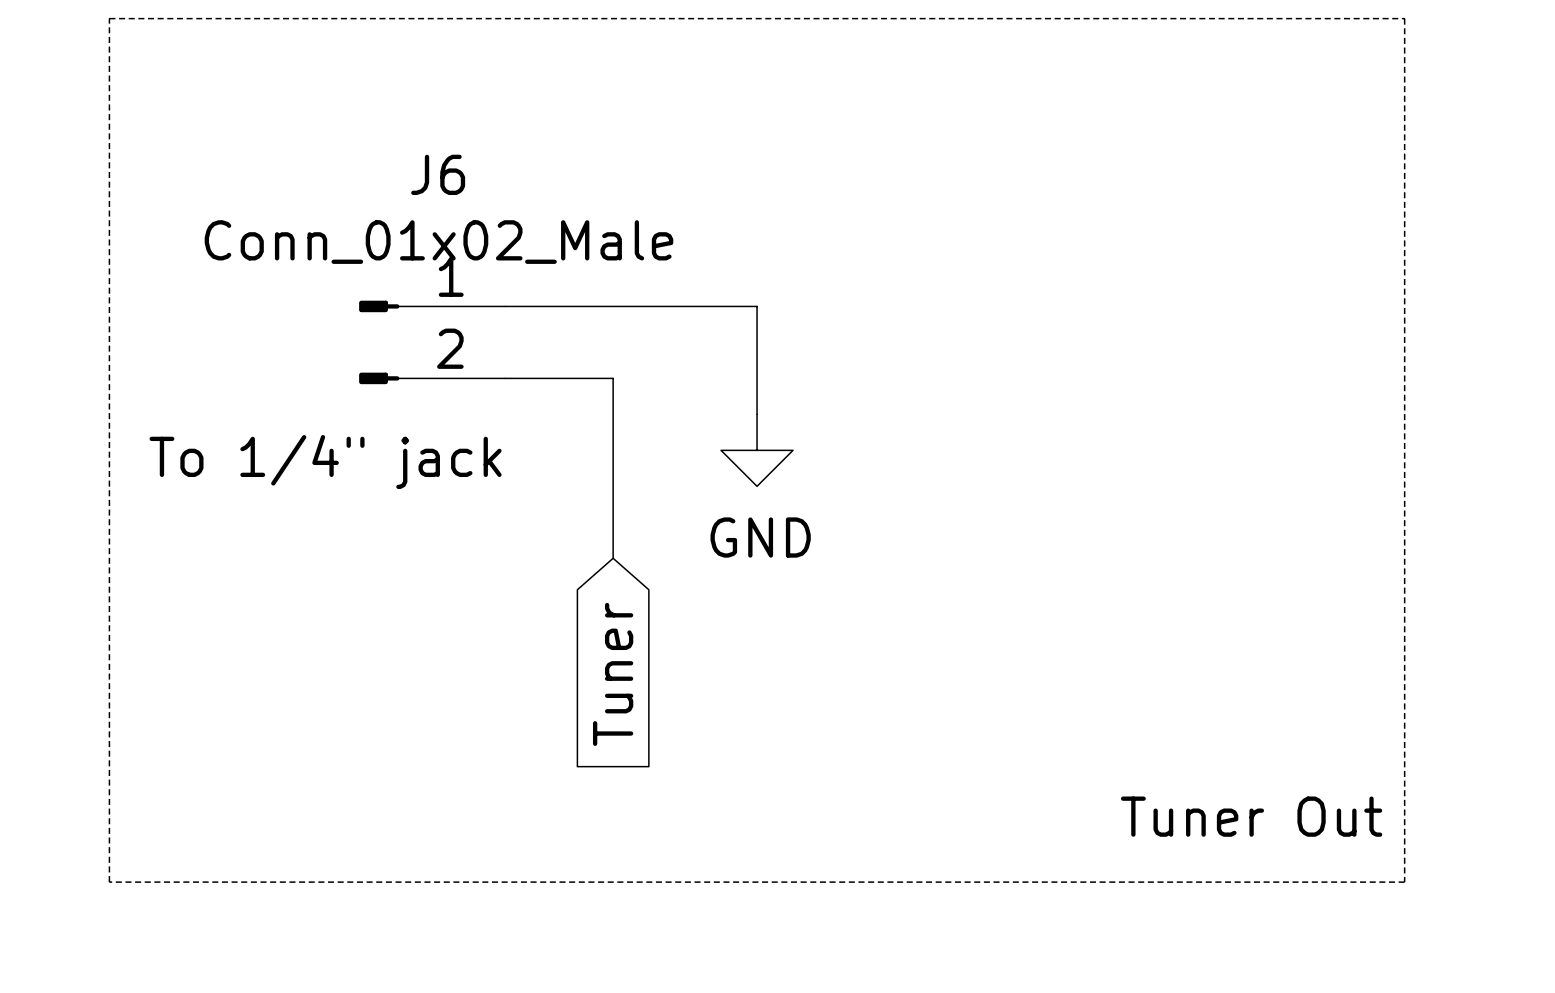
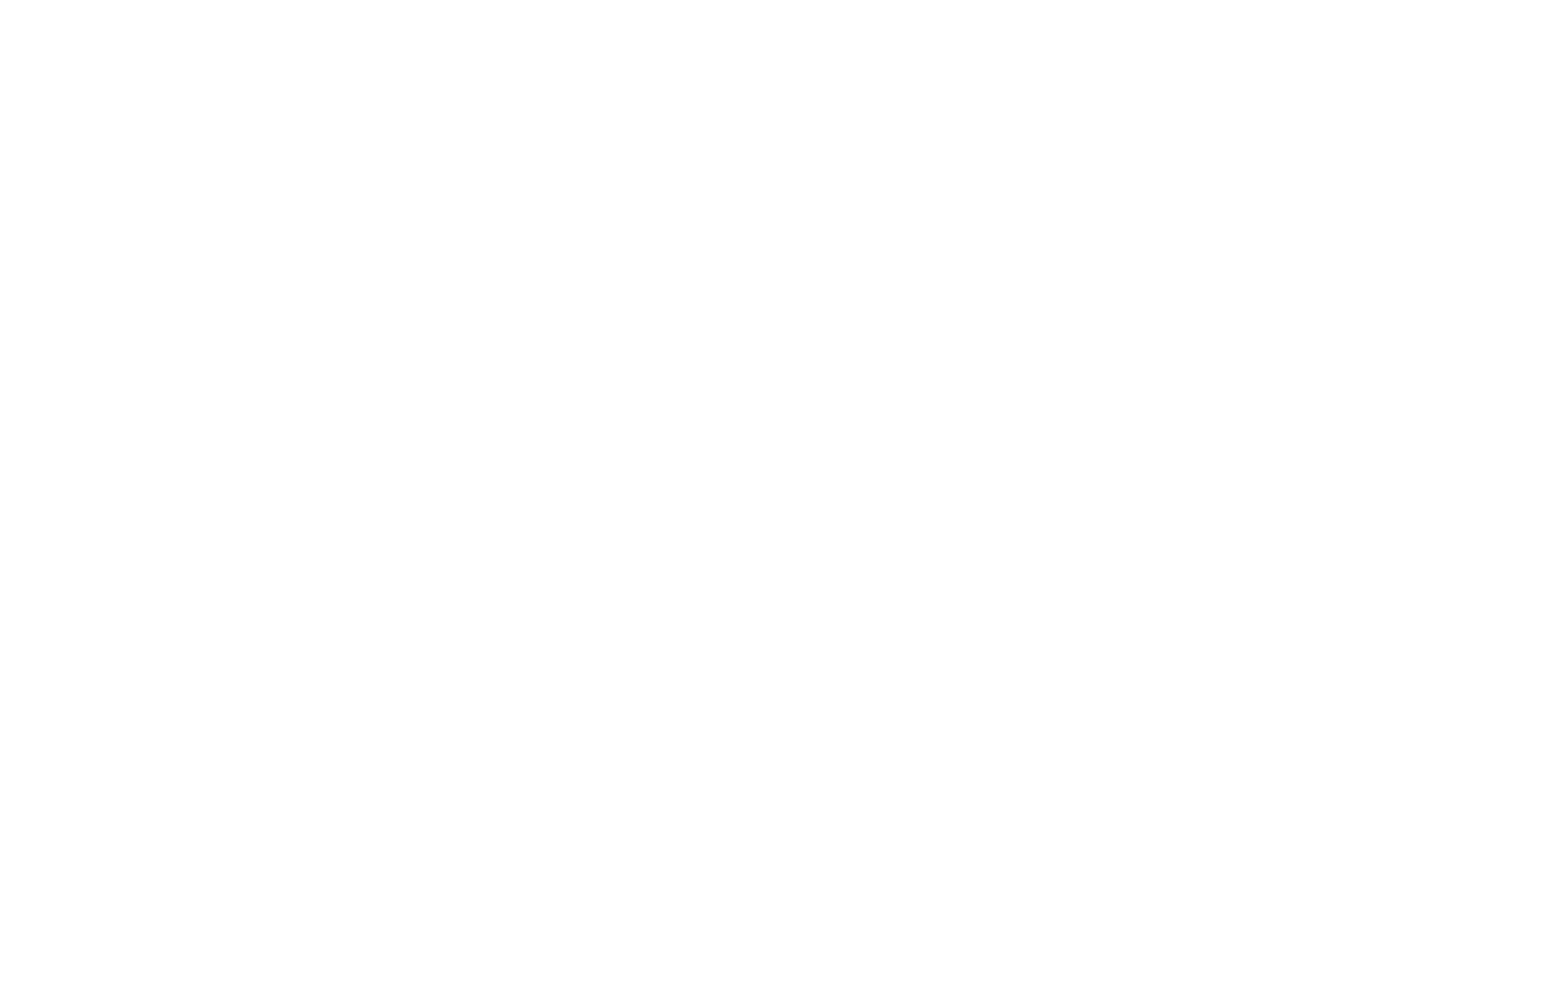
line: (109, 18) (109, 882) (1404, 882) (1404, 18) (109, 18) -> none
wire: (505, 306) (757, 306) (757, 414) -> none
J6: Conn_01x02_Male (432, 342) -> none
wire: (505, 378) (613, 378) (613, 558) -> none
power symbol: GND (757, 450) -> none
text: To 1/4" jack (325, 462) -> none
global label: Tuner (613, 674) -> none
text: Tuner Out (1251, 816) -> none

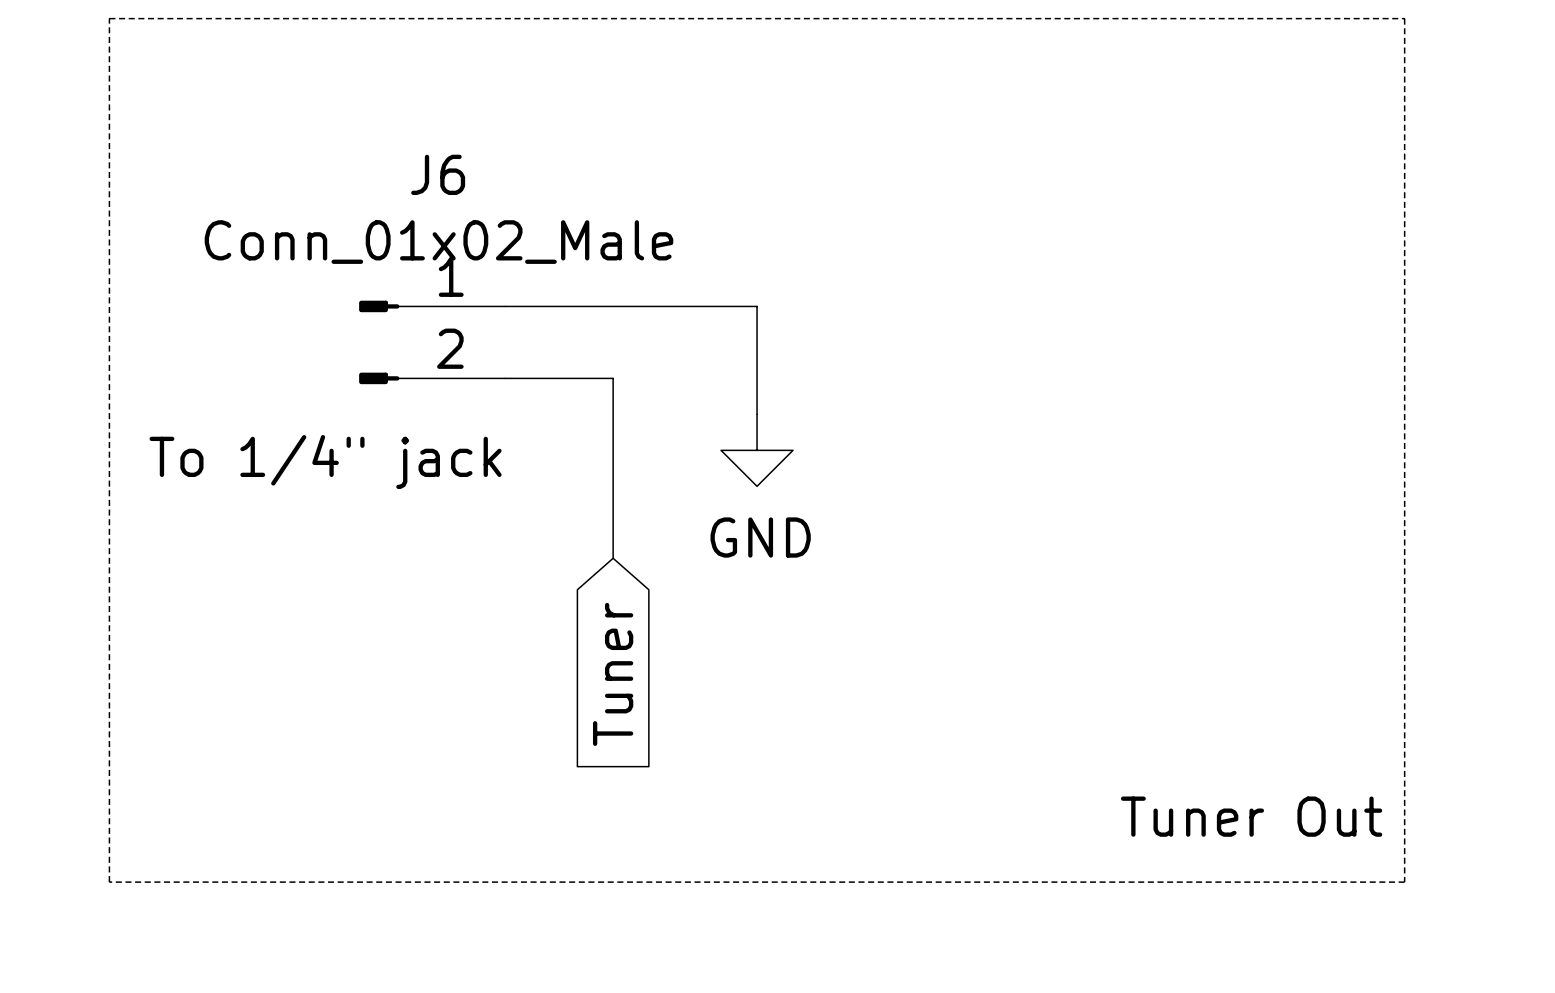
line: none -> (109, 18) (109, 882) (1404, 882) (1404, 18) (109, 18)
wire: none -> (505, 306) (757, 306) (757, 414)
J6: none -> Conn_01x02_Male (432, 342)
wire: none -> (505, 378) (613, 378) (613, 558)
power symbol: none -> GND (757, 450)
text: none -> To 1/4" jack (325, 462)
global label: none -> Tuner (613, 674)
text: none -> Tuner Out (1251, 816)

